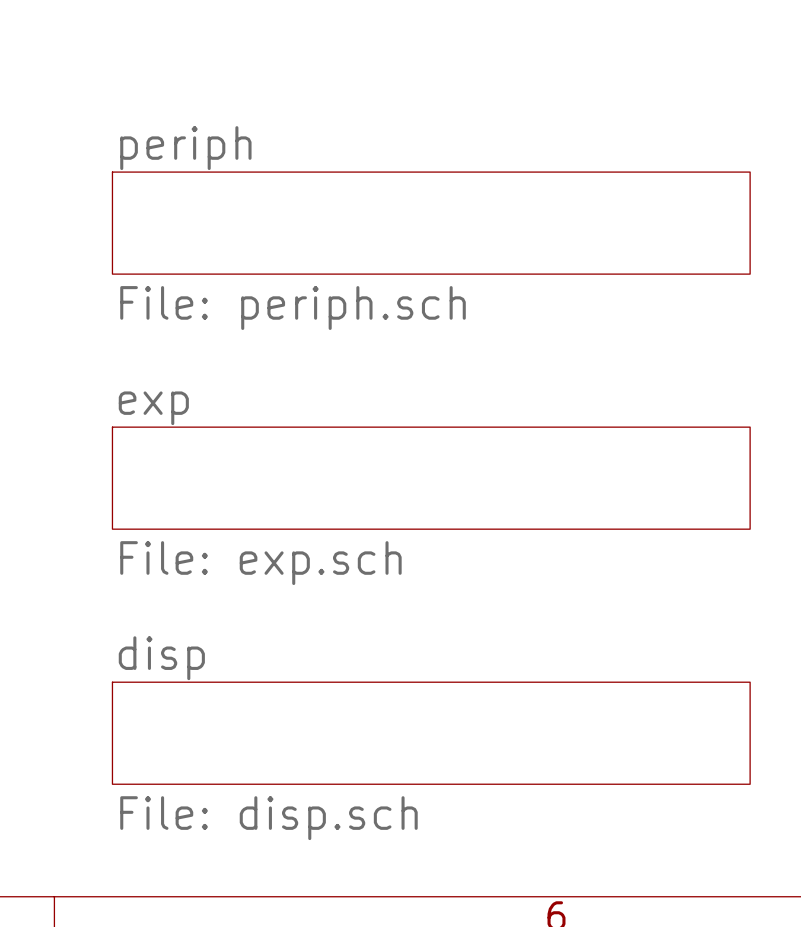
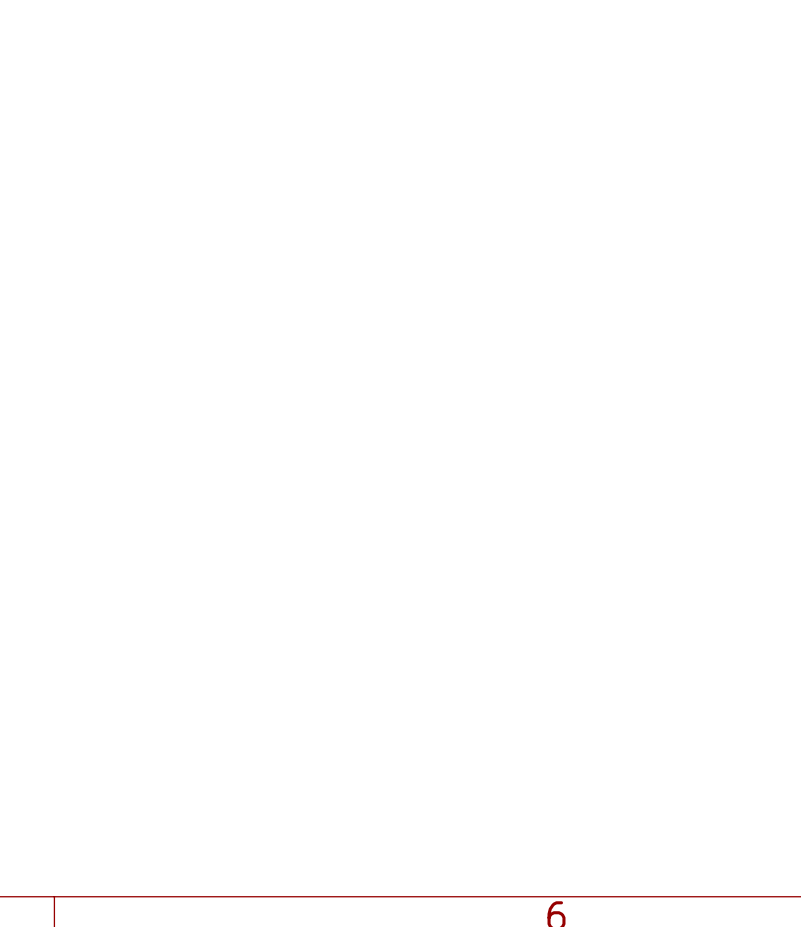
sheet periph: File: periph.sch (431, 223) -> none
sheet exp: File: exp.sch (431, 478) -> none
sheet disp: File: disp.sch (431, 733) -> none

